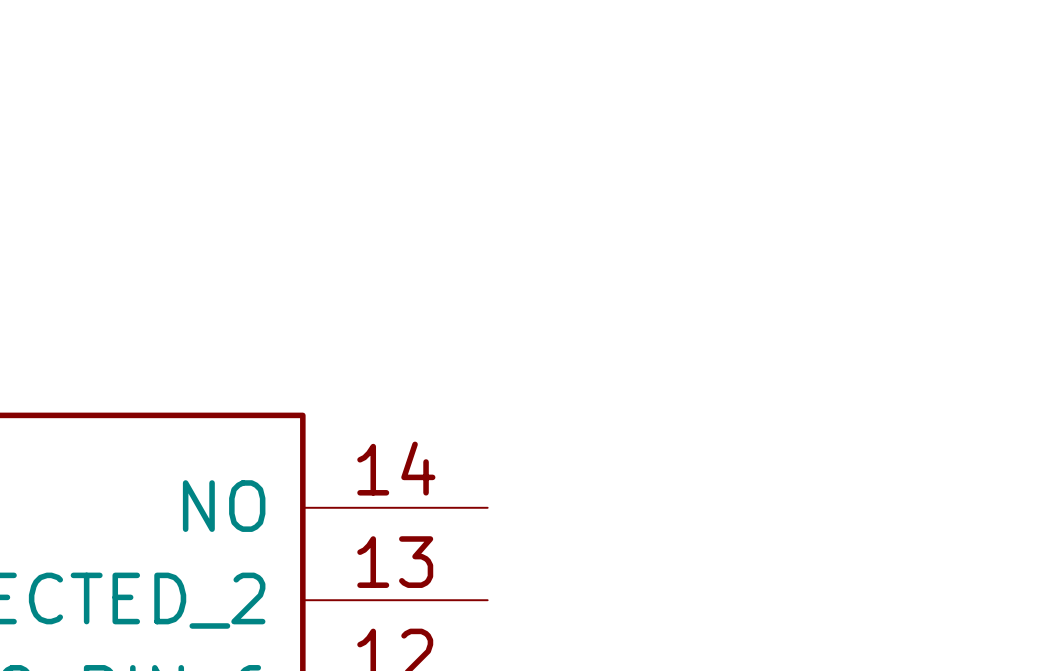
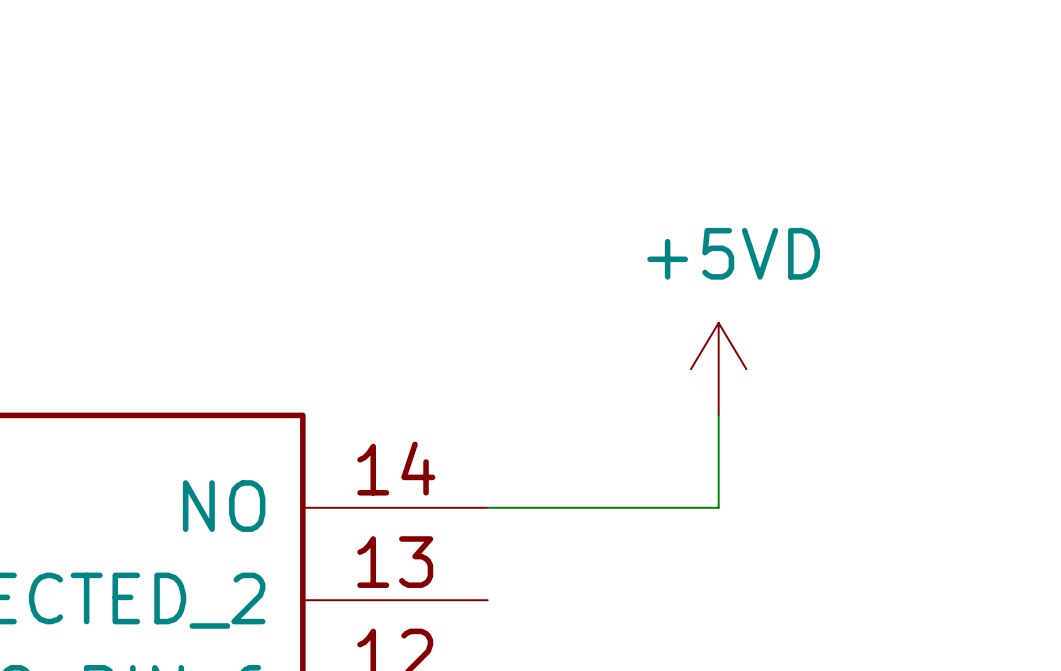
power symbol: none -> +5VD (718, 369)
wire: none -> (718, 415) (718, 507) (487, 507)

